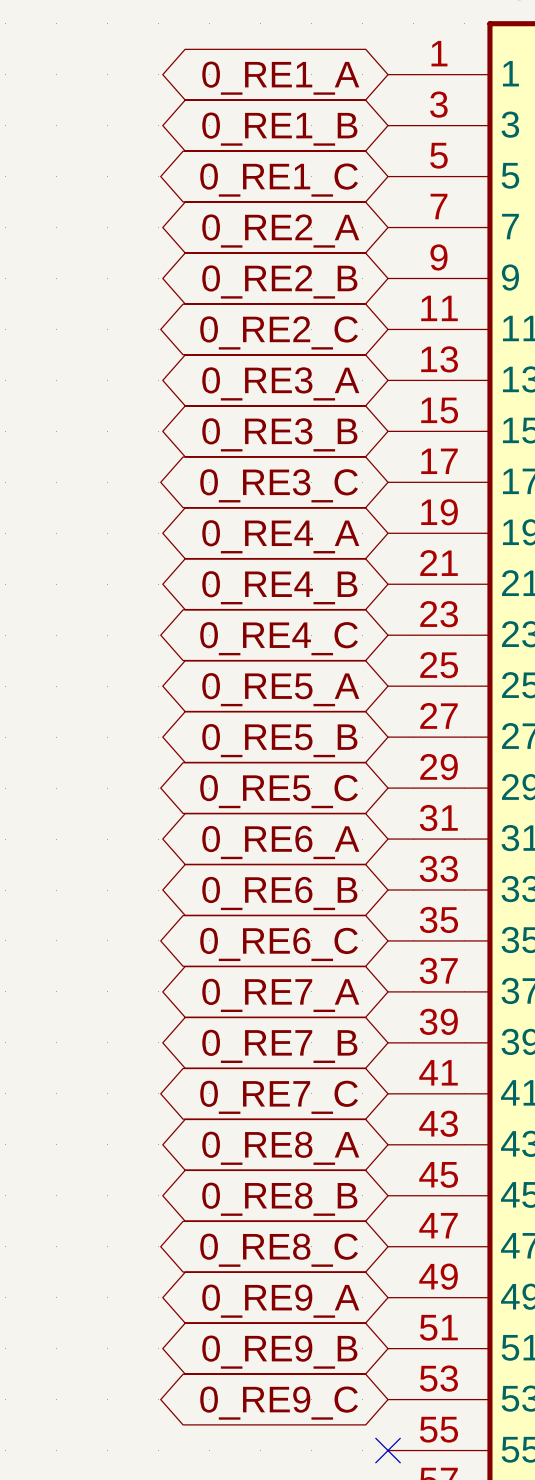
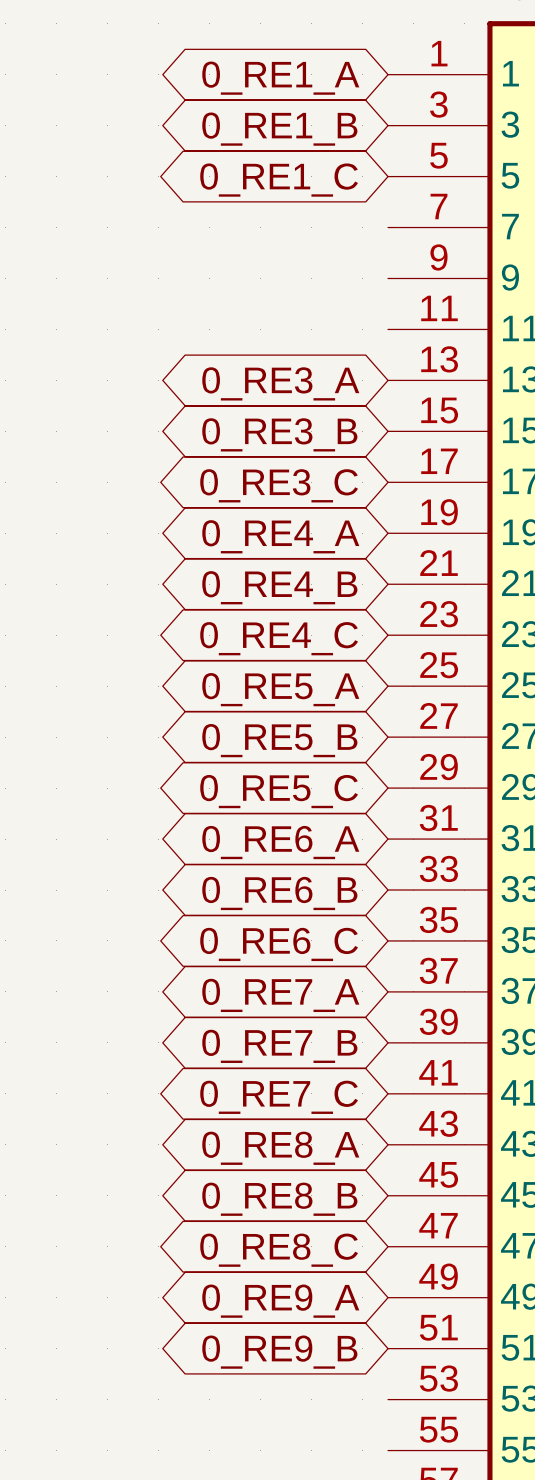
global label: 0_RE2_A (280, 231) -> none
global label: 0_RE2_B (279, 281) -> none
global label: 0_RE2_C (279, 332) -> none
global label: 0_RE9_C (279, 1403) -> none
no-connect mark: (388, 1450) -> none

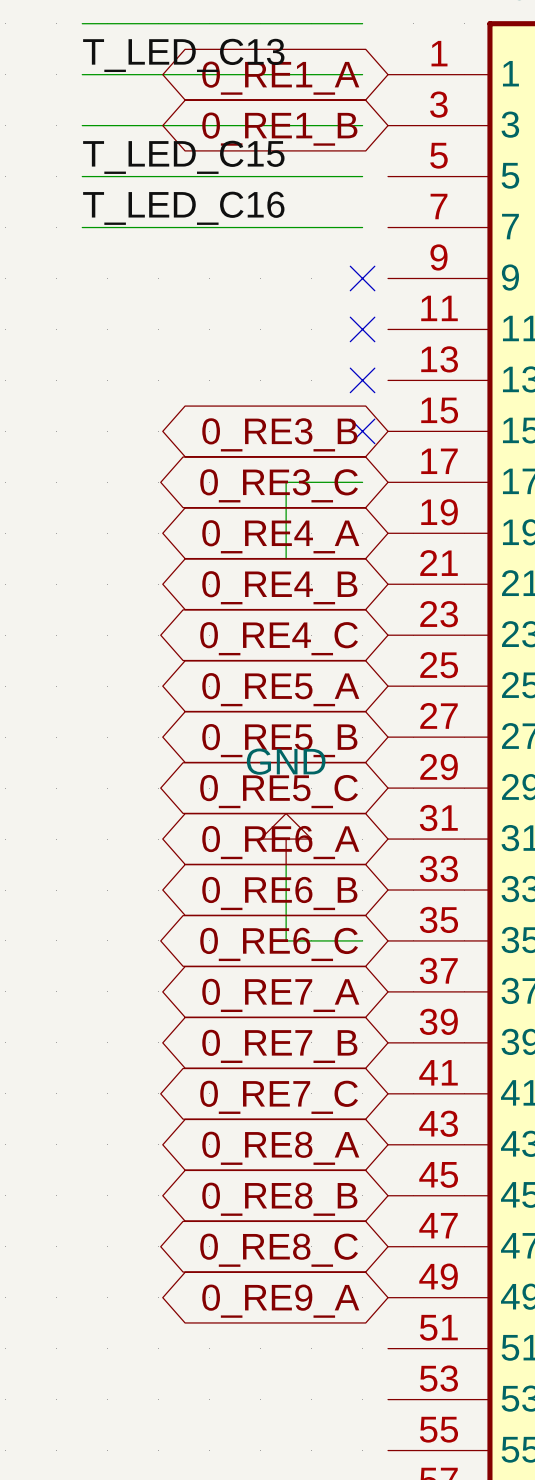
wire: none -> (82, 23) (362, 23)
label: none -> T_LED_C13 (183, 55)
wire: none -> (82, 74) (362, 74)
wire: none -> (82, 125) (362, 125)
label: none -> T_LED_C15 (183, 157)
wire: none -> (82, 176) (362, 176)
global label: 0_RE1_C (279, 180) -> none
label: none -> T_LED_C16 (183, 208)
wire: none -> (82, 227) (362, 227)
no-connect mark: none -> (362, 278)
no-connect mark: none -> (362, 329)
no-connect mark: none -> (362, 380)
global label: 0_RE3_A (280, 383) -> none
no-connect mark: none -> (362, 431)
wire: none -> (362, 482) (286, 482) (286, 558)
power symbol: none -> GND (286, 839)
wire: none -> (286, 864) (286, 940) (362, 940)
global label: 0_RE9_B (279, 1352) -> none

